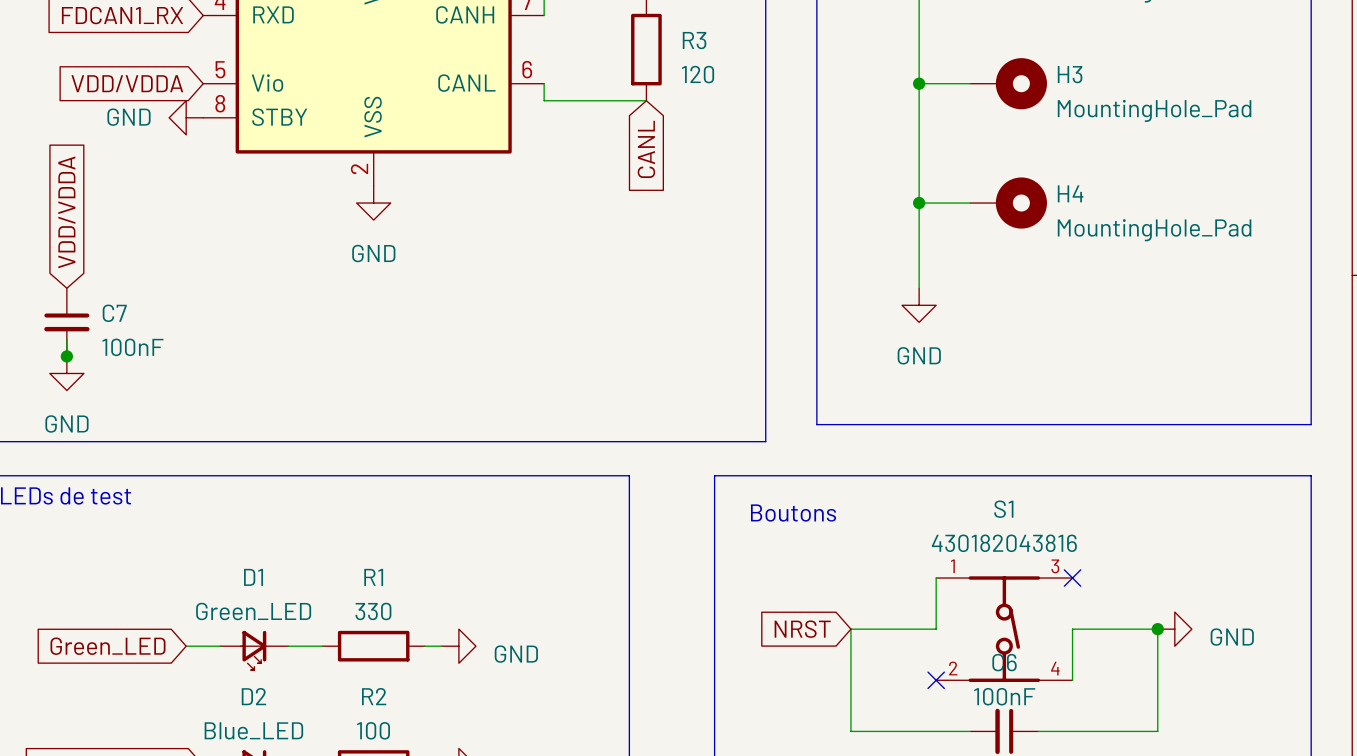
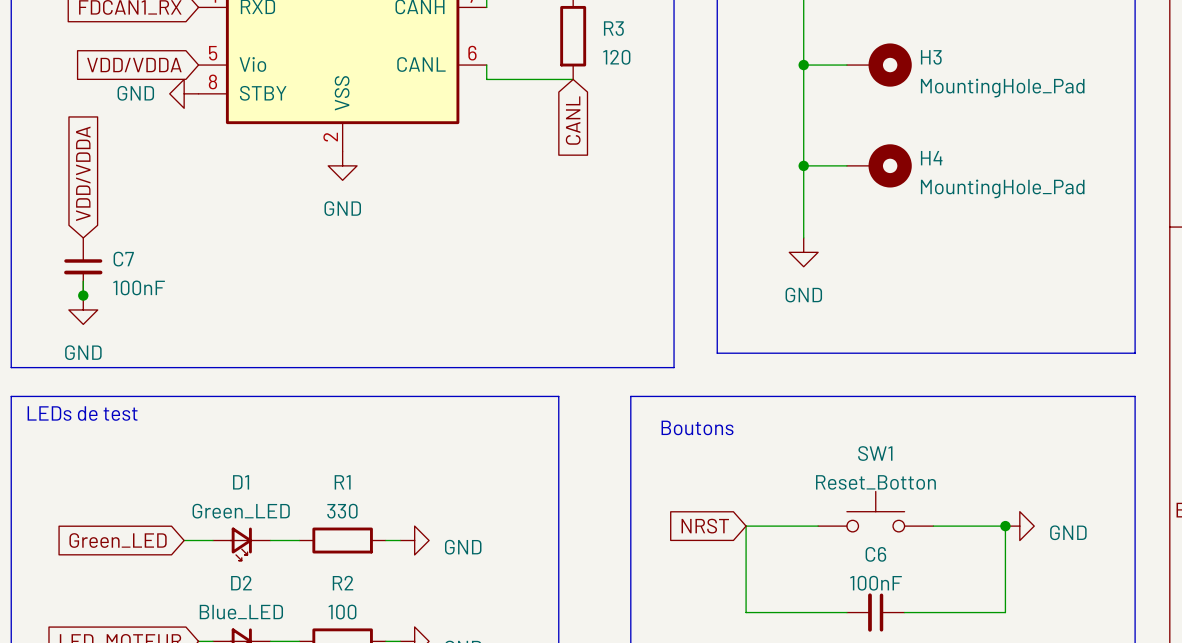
wire: (936, 578) (936, 629) -> none
no-connect mark: (1072, 578) -> none
SW1: none -> Reset_Botton (875, 511)
S1: 430182043816 (1004, 629) -> none
wire: (1072, 629) (1072, 680) -> none
no-connect mark: (936, 680) -> none

